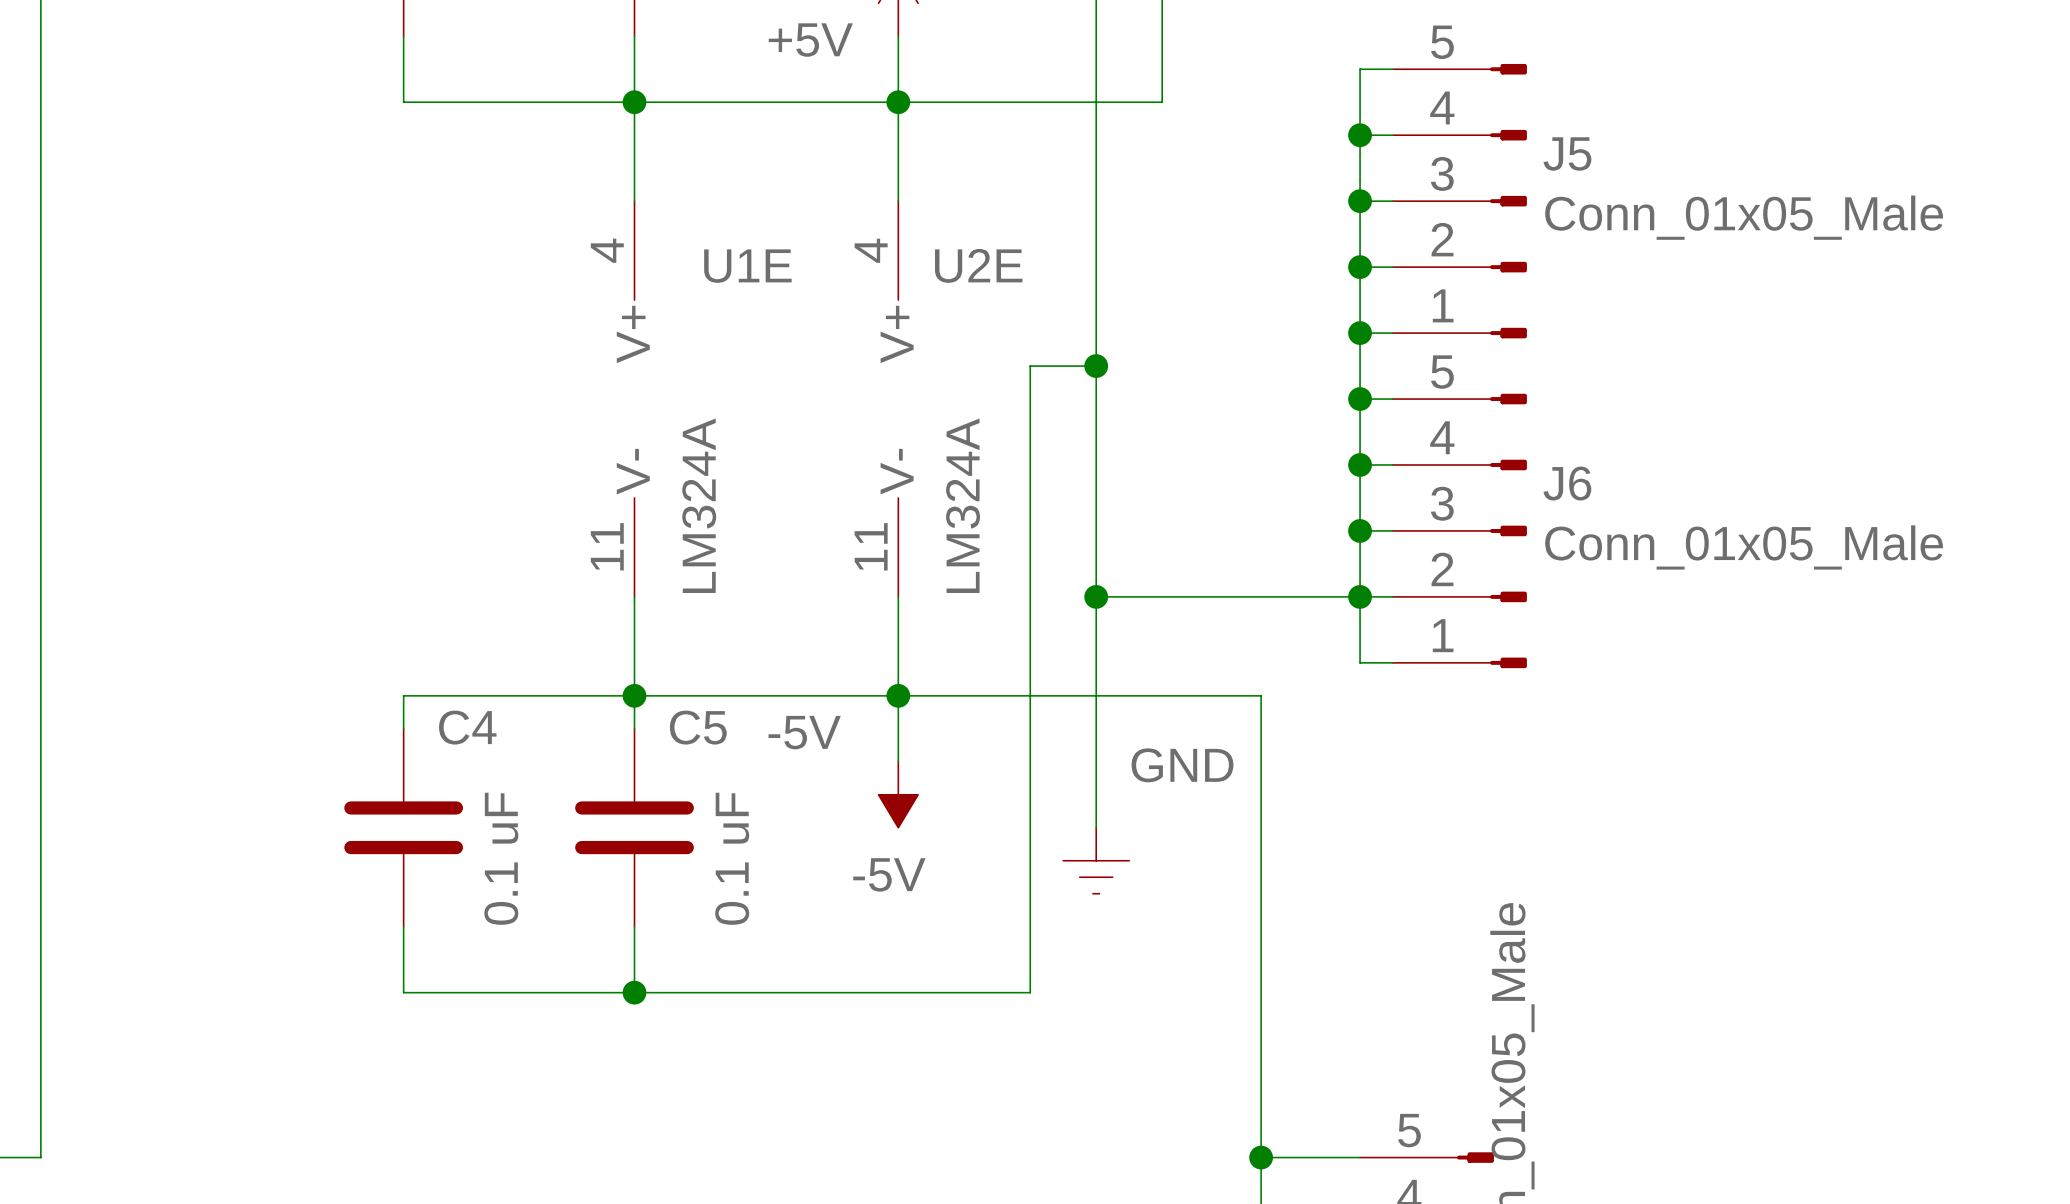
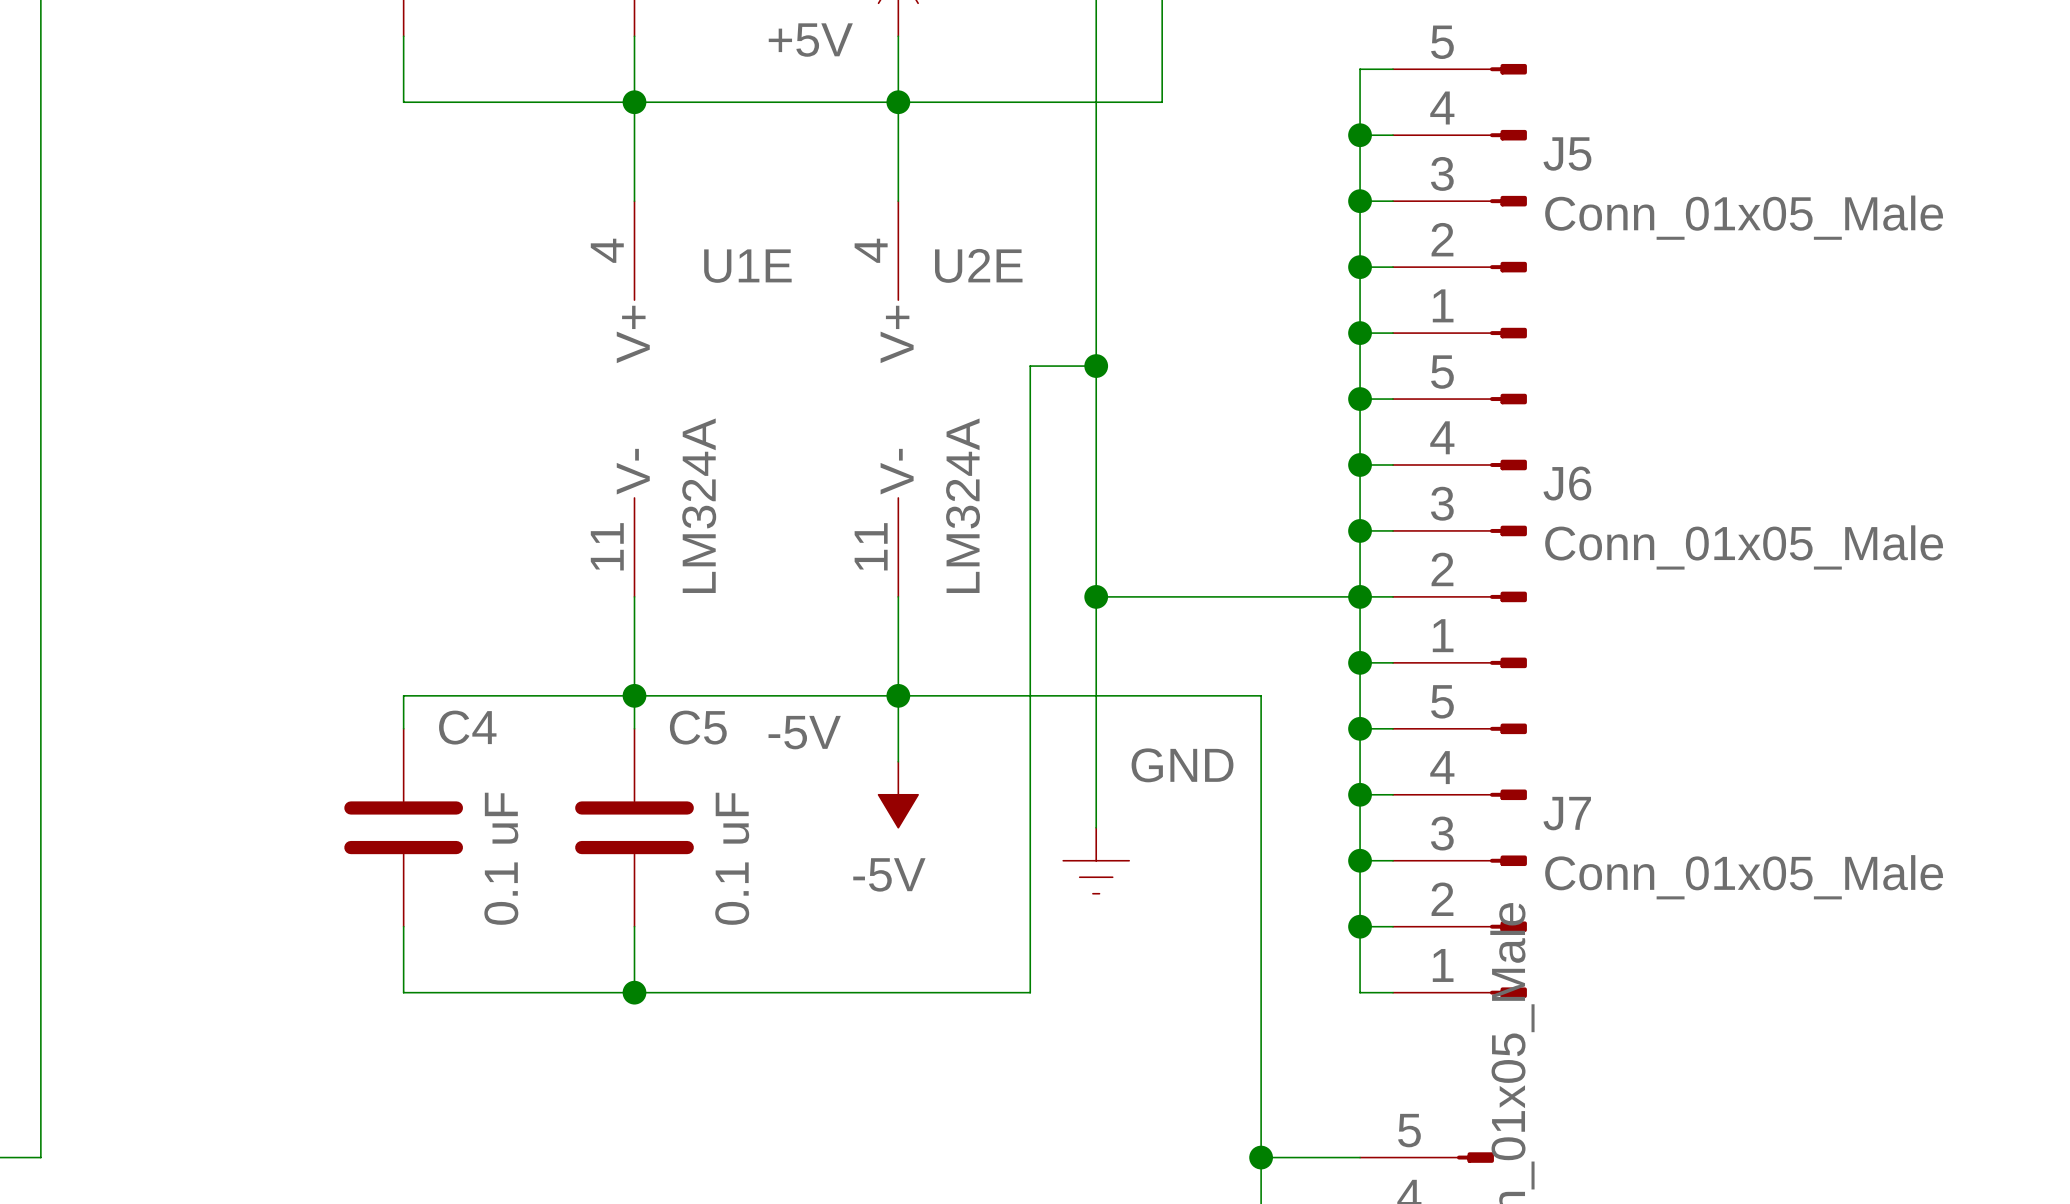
wire: none -> (1360, 662) (1360, 992) (1393, 992)
junction: none -> (1360, 662)
wire: none -> (1360, 728) (1393, 728)
junction: none -> (1360, 728)
wire: none -> (1360, 794) (1393, 794)
junction: none -> (1360, 794)
wire: none -> (1360, 860) (1393, 860)
junction: none -> (1360, 860)
J7: none -> Conn_01x05_Male (1459, 860)
wire: none -> (1360, 926) (1393, 926)
junction: none -> (1360, 926)

